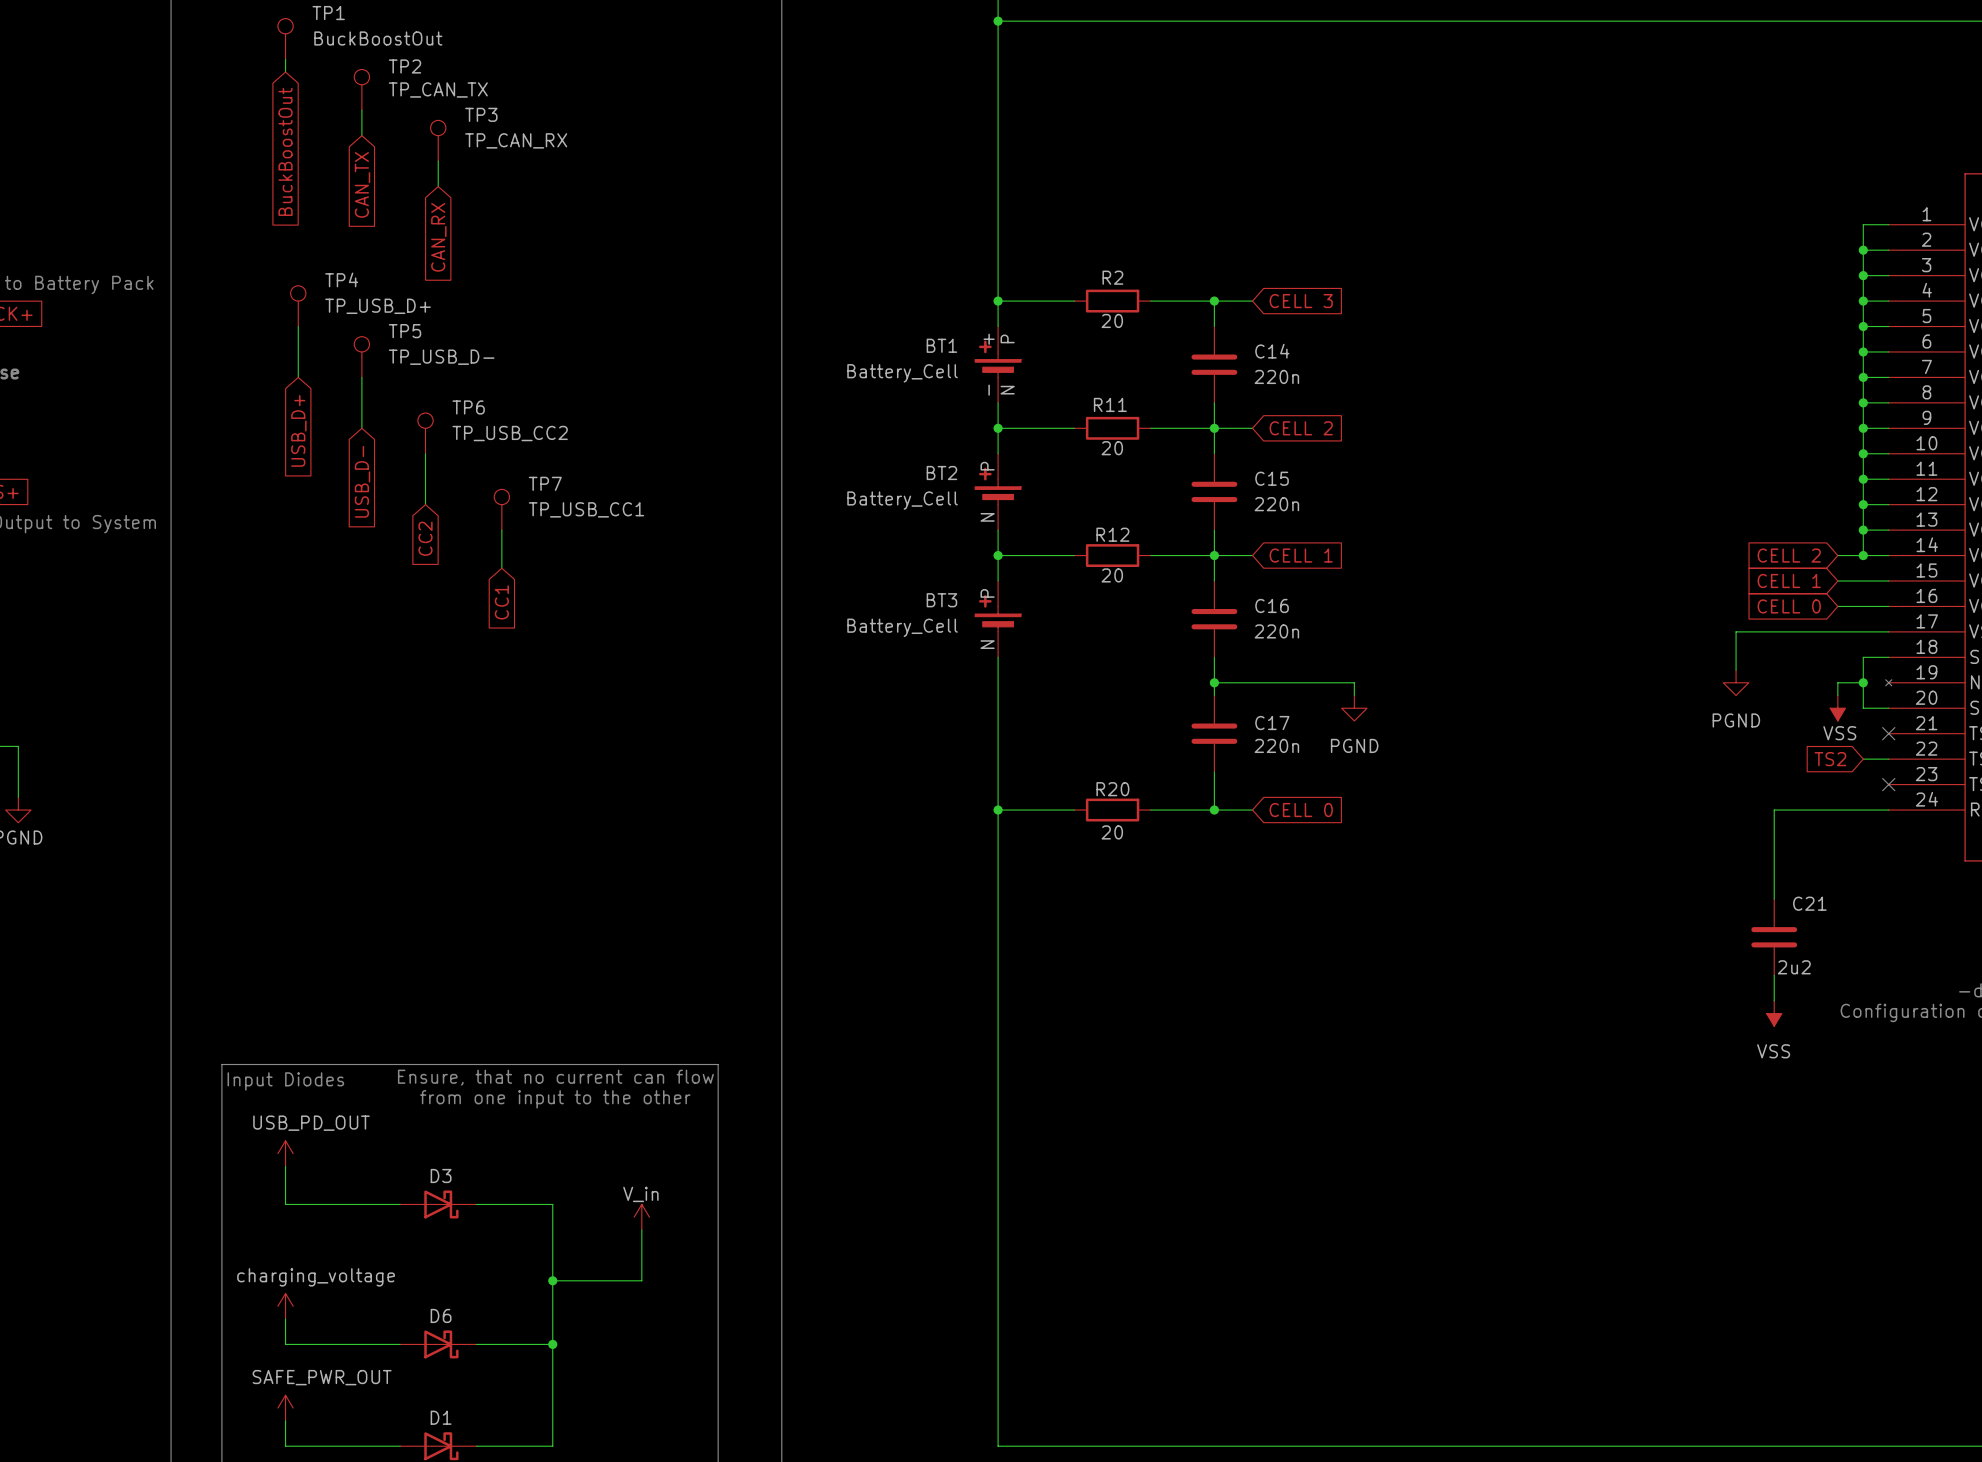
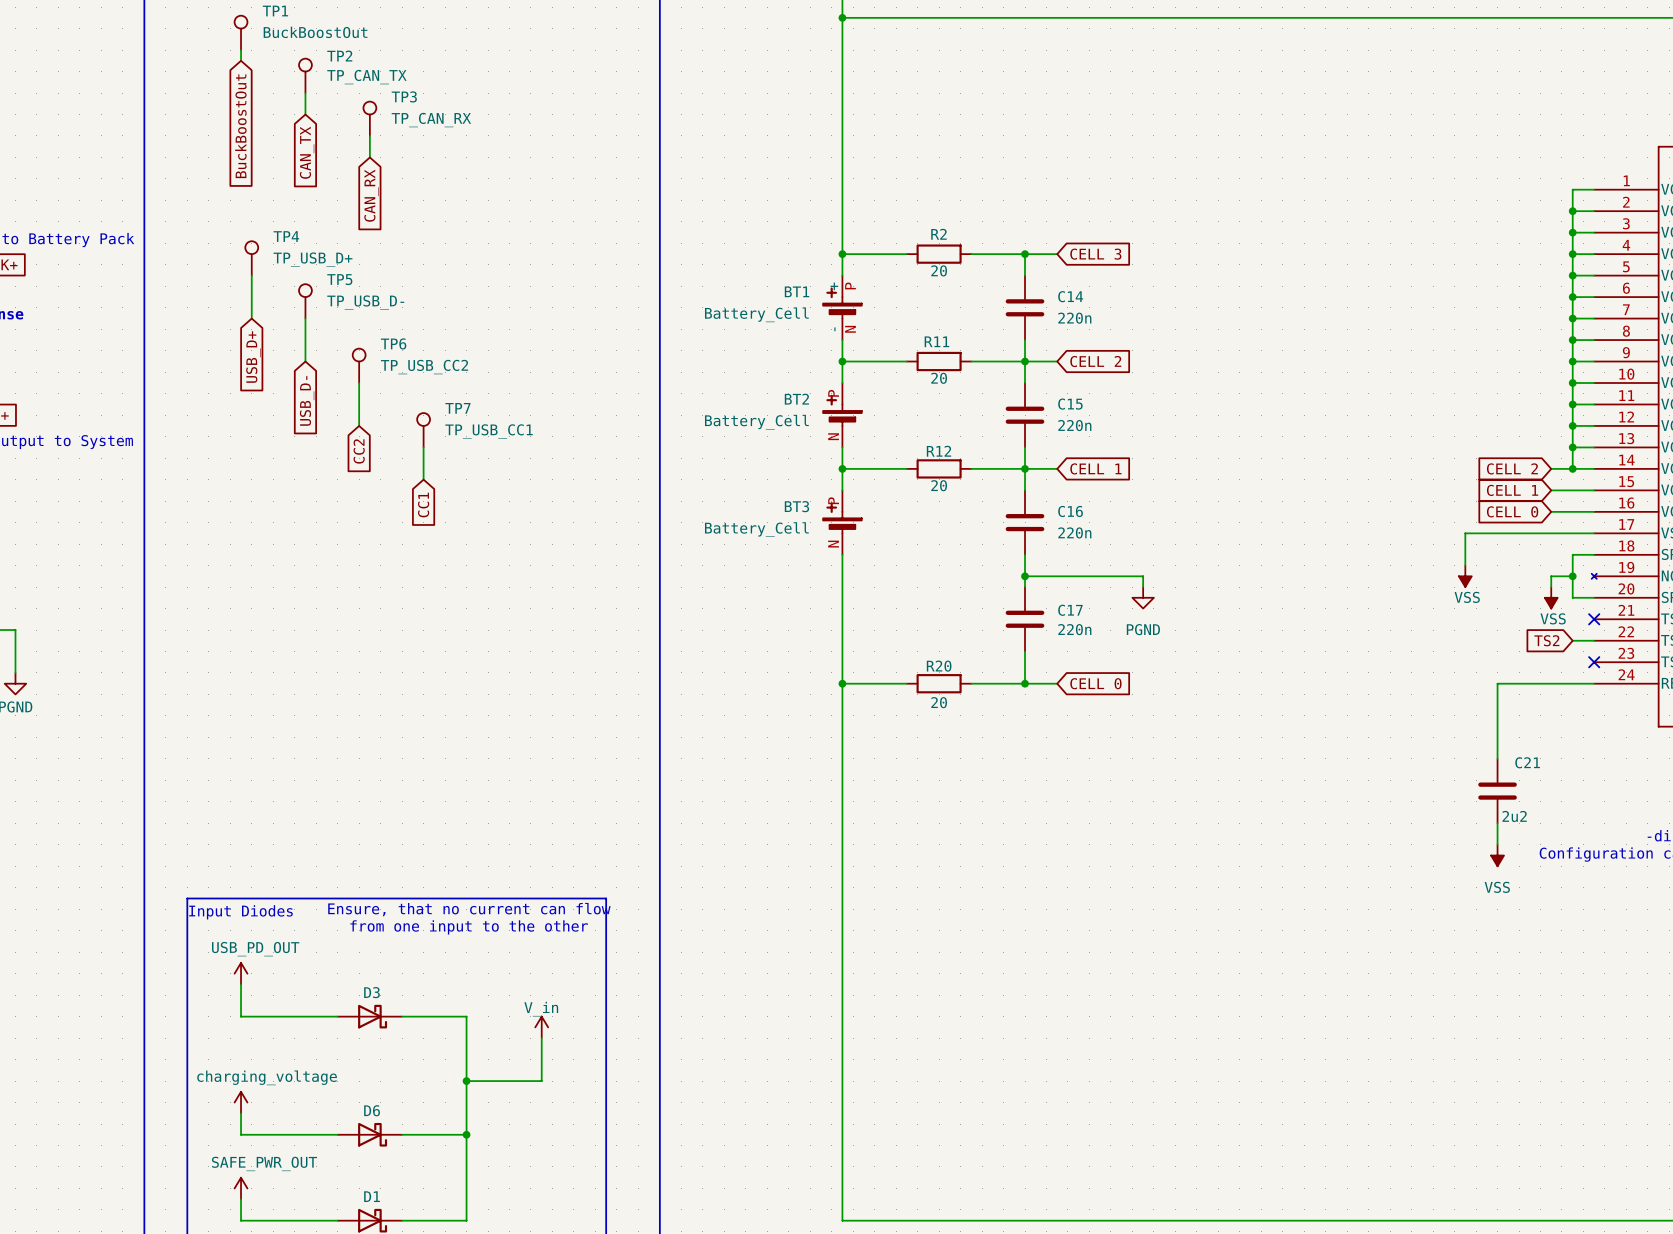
power symbol: PGND (1736, 682) -> VSS (1465, 576)

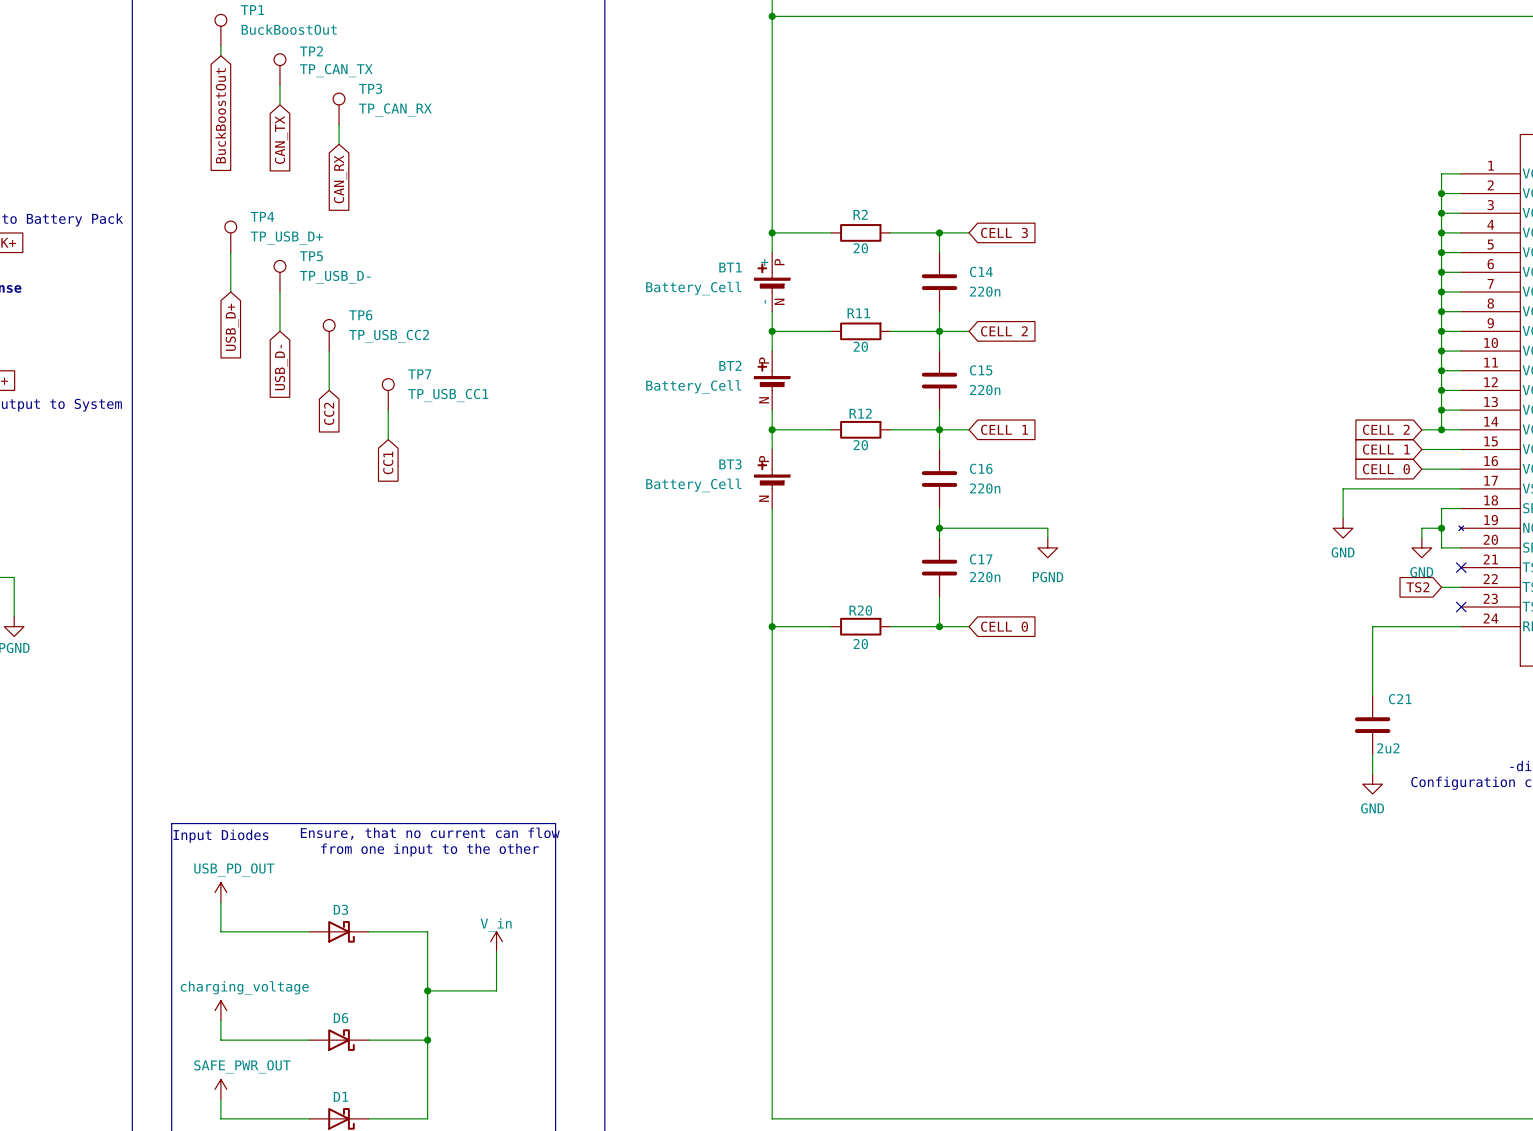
power symbol: VSS (1465, 576) -> GND (1343, 528)
power symbol: VSS (1551, 597) -> GND (1421, 547)
power symbol: VSS (1497, 855) -> GND (1372, 784)

